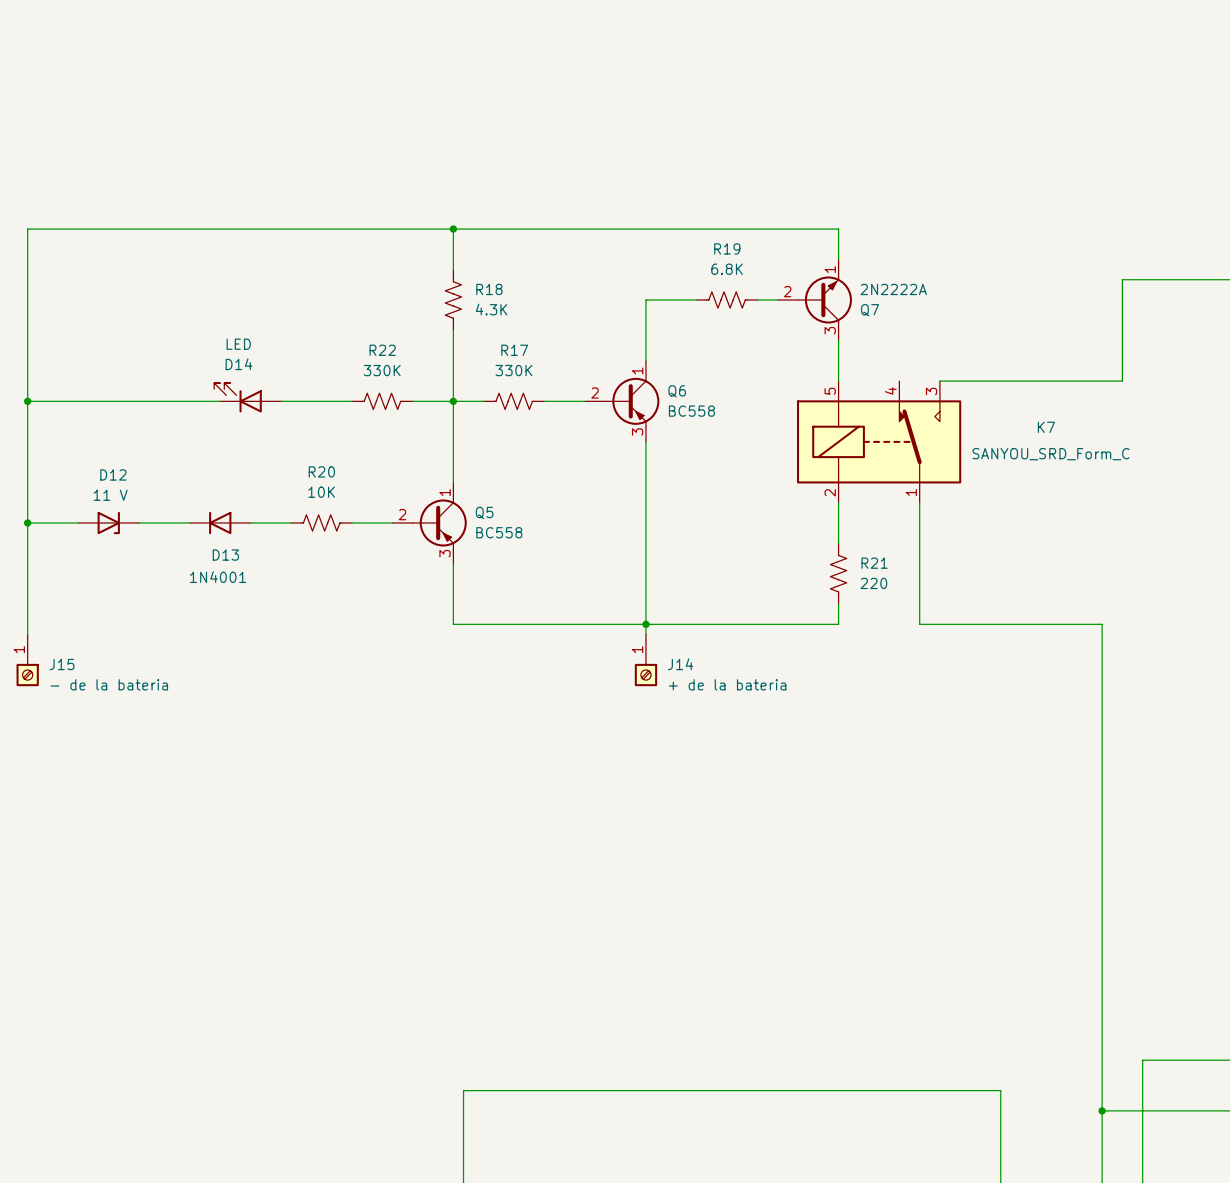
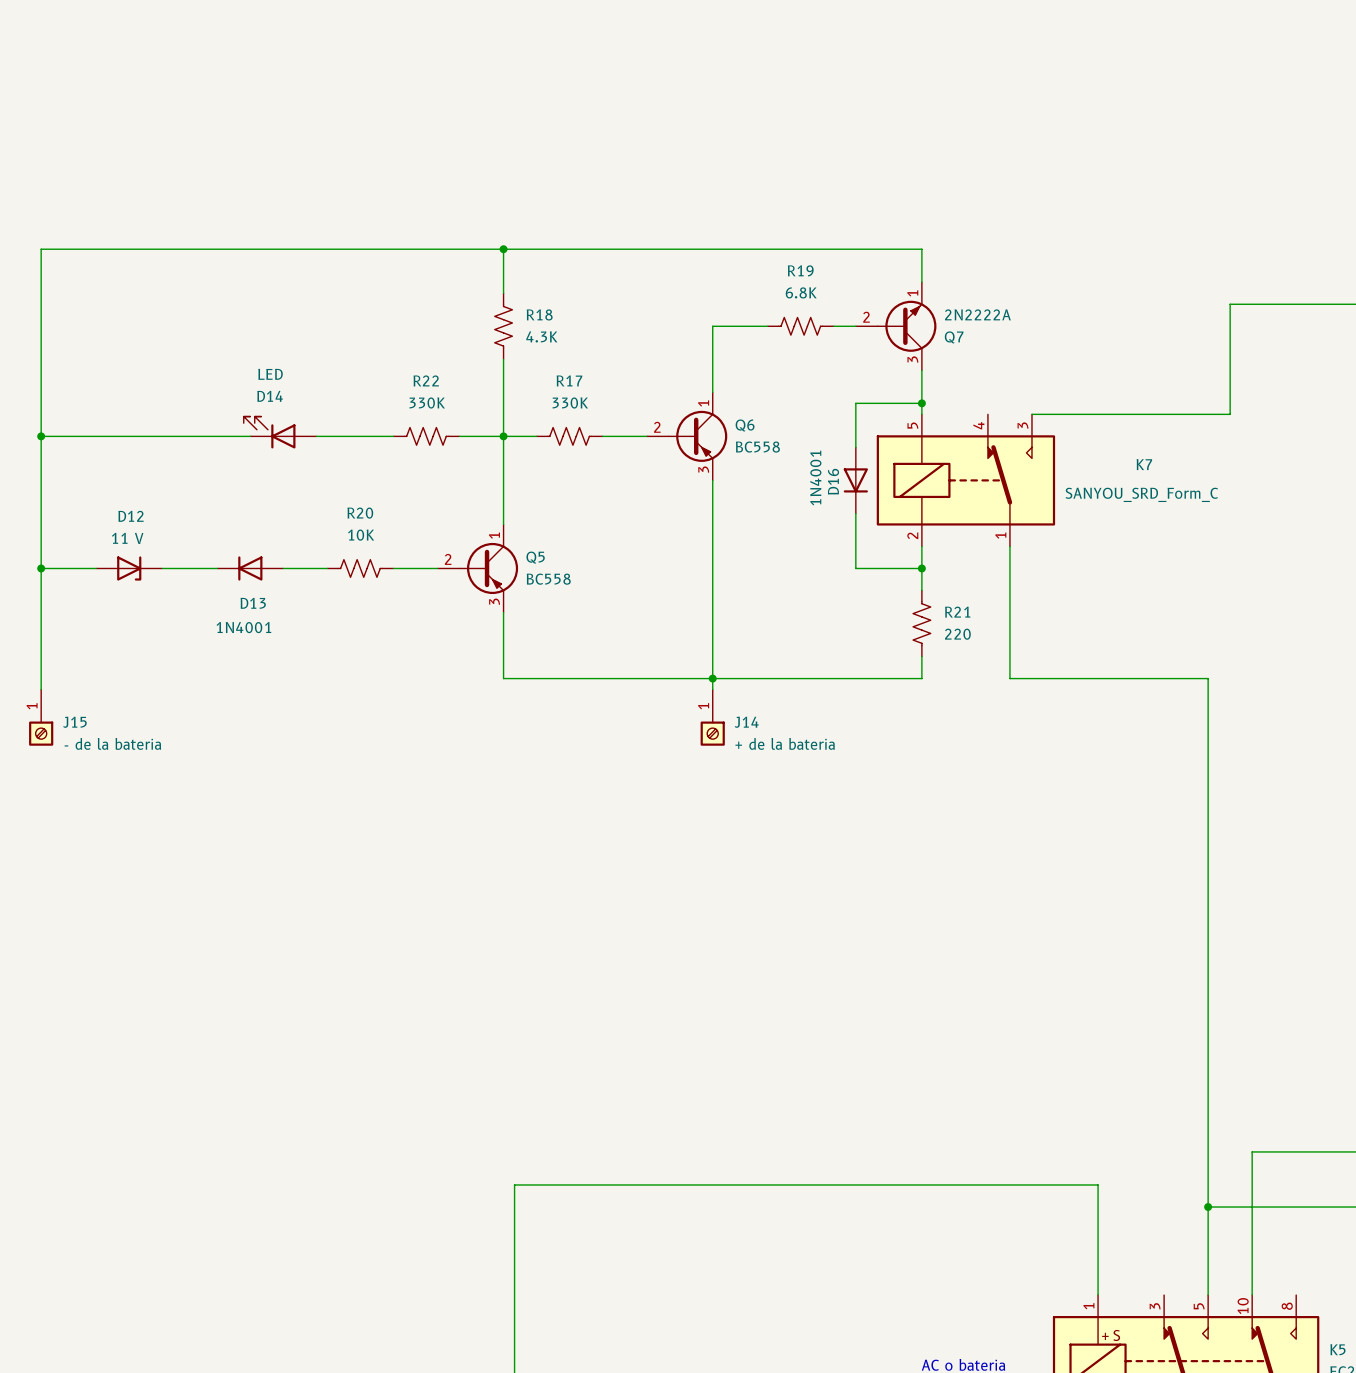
wire: none -> (921, 403) (855, 403) (855, 447)
junction: none -> (921, 403)
D16: none -> 1N4001 (855, 480)
wire: none -> (855, 513) (855, 568) (921, 568)
junction: none -> (921, 568)

